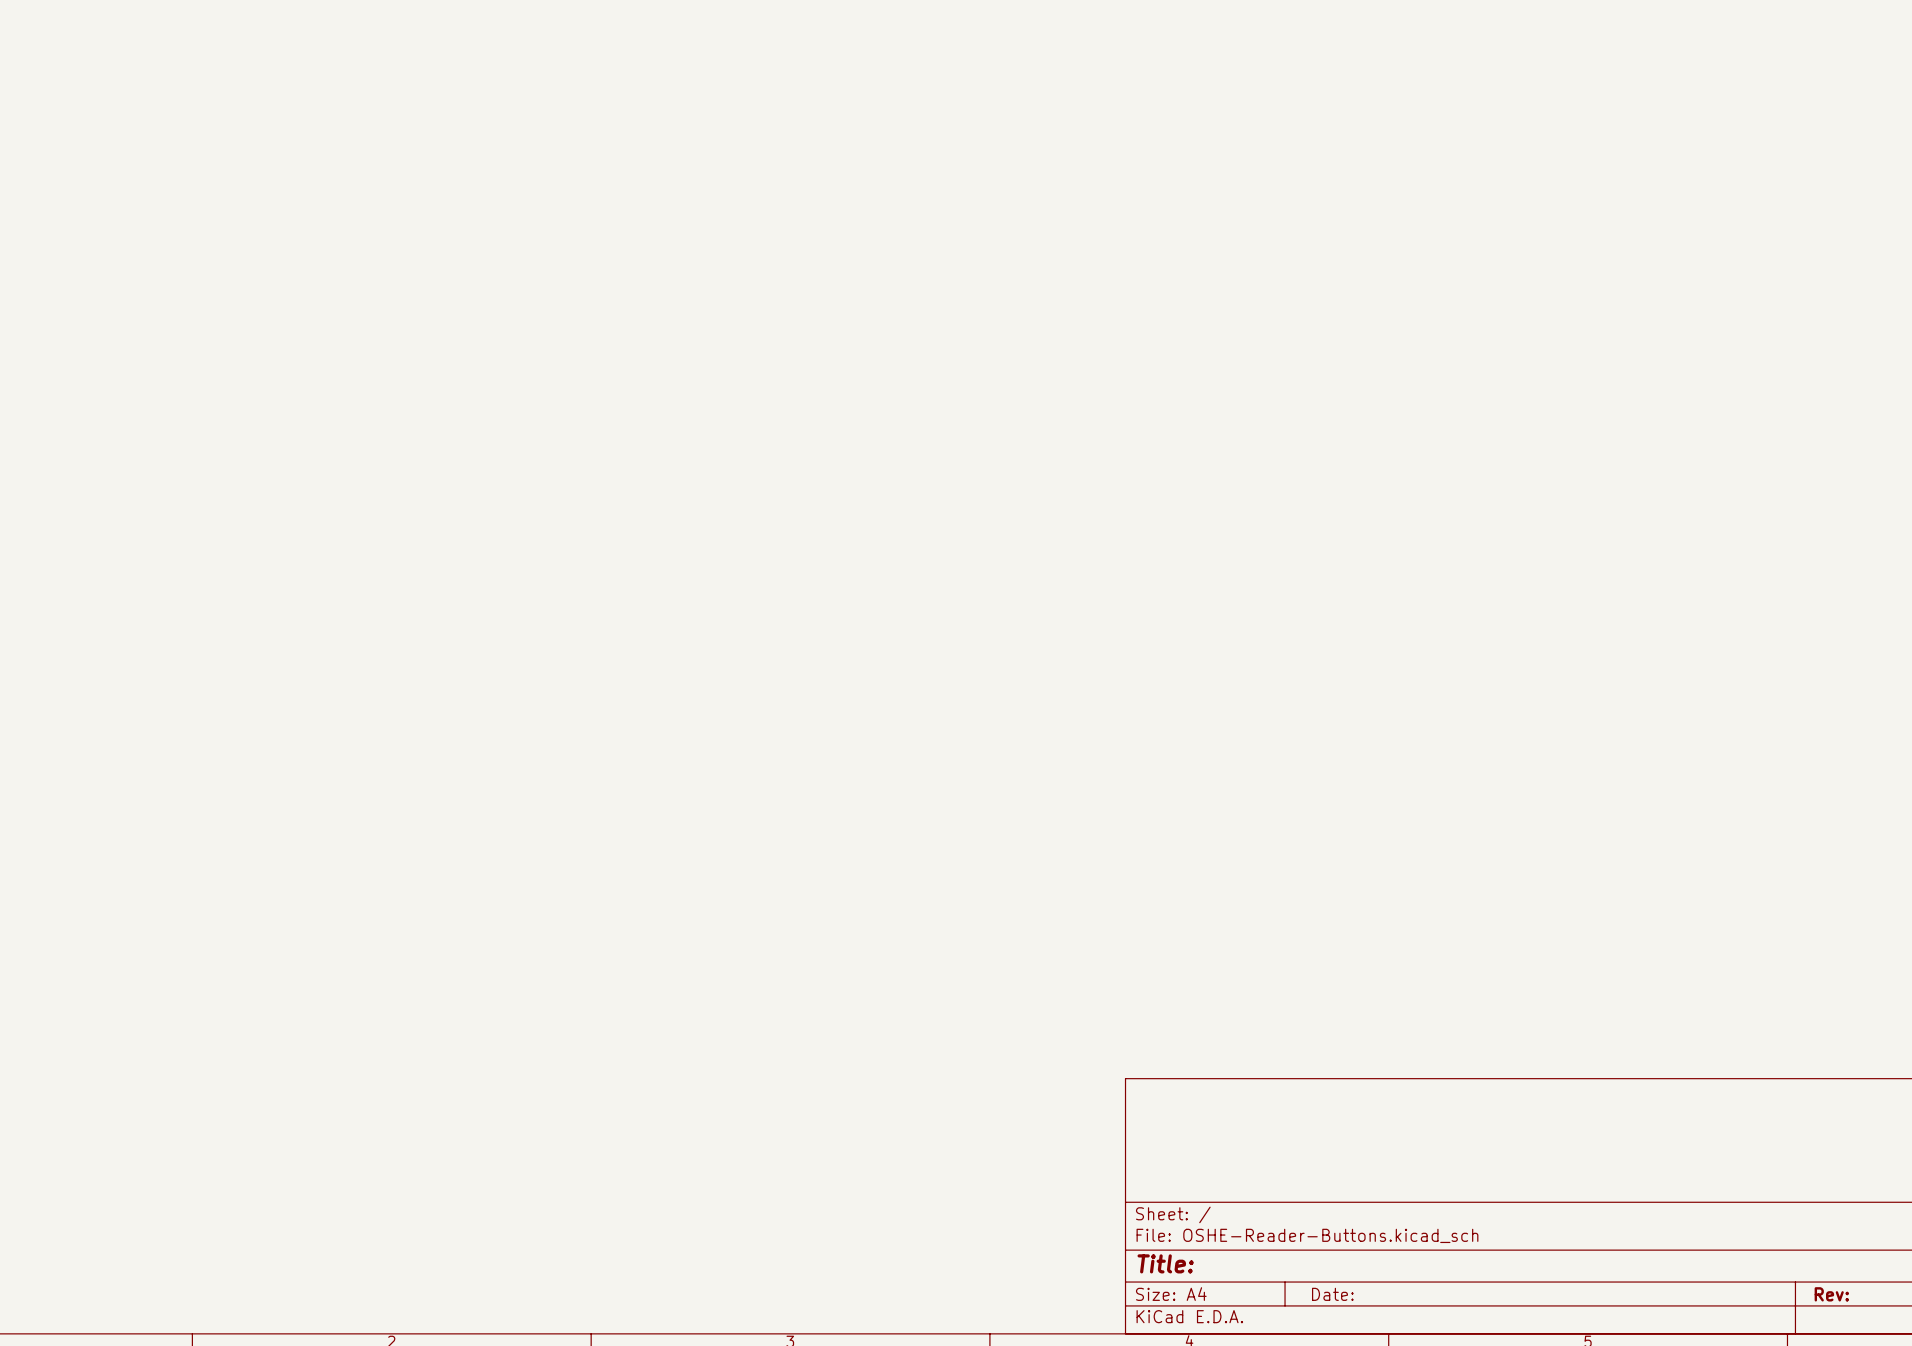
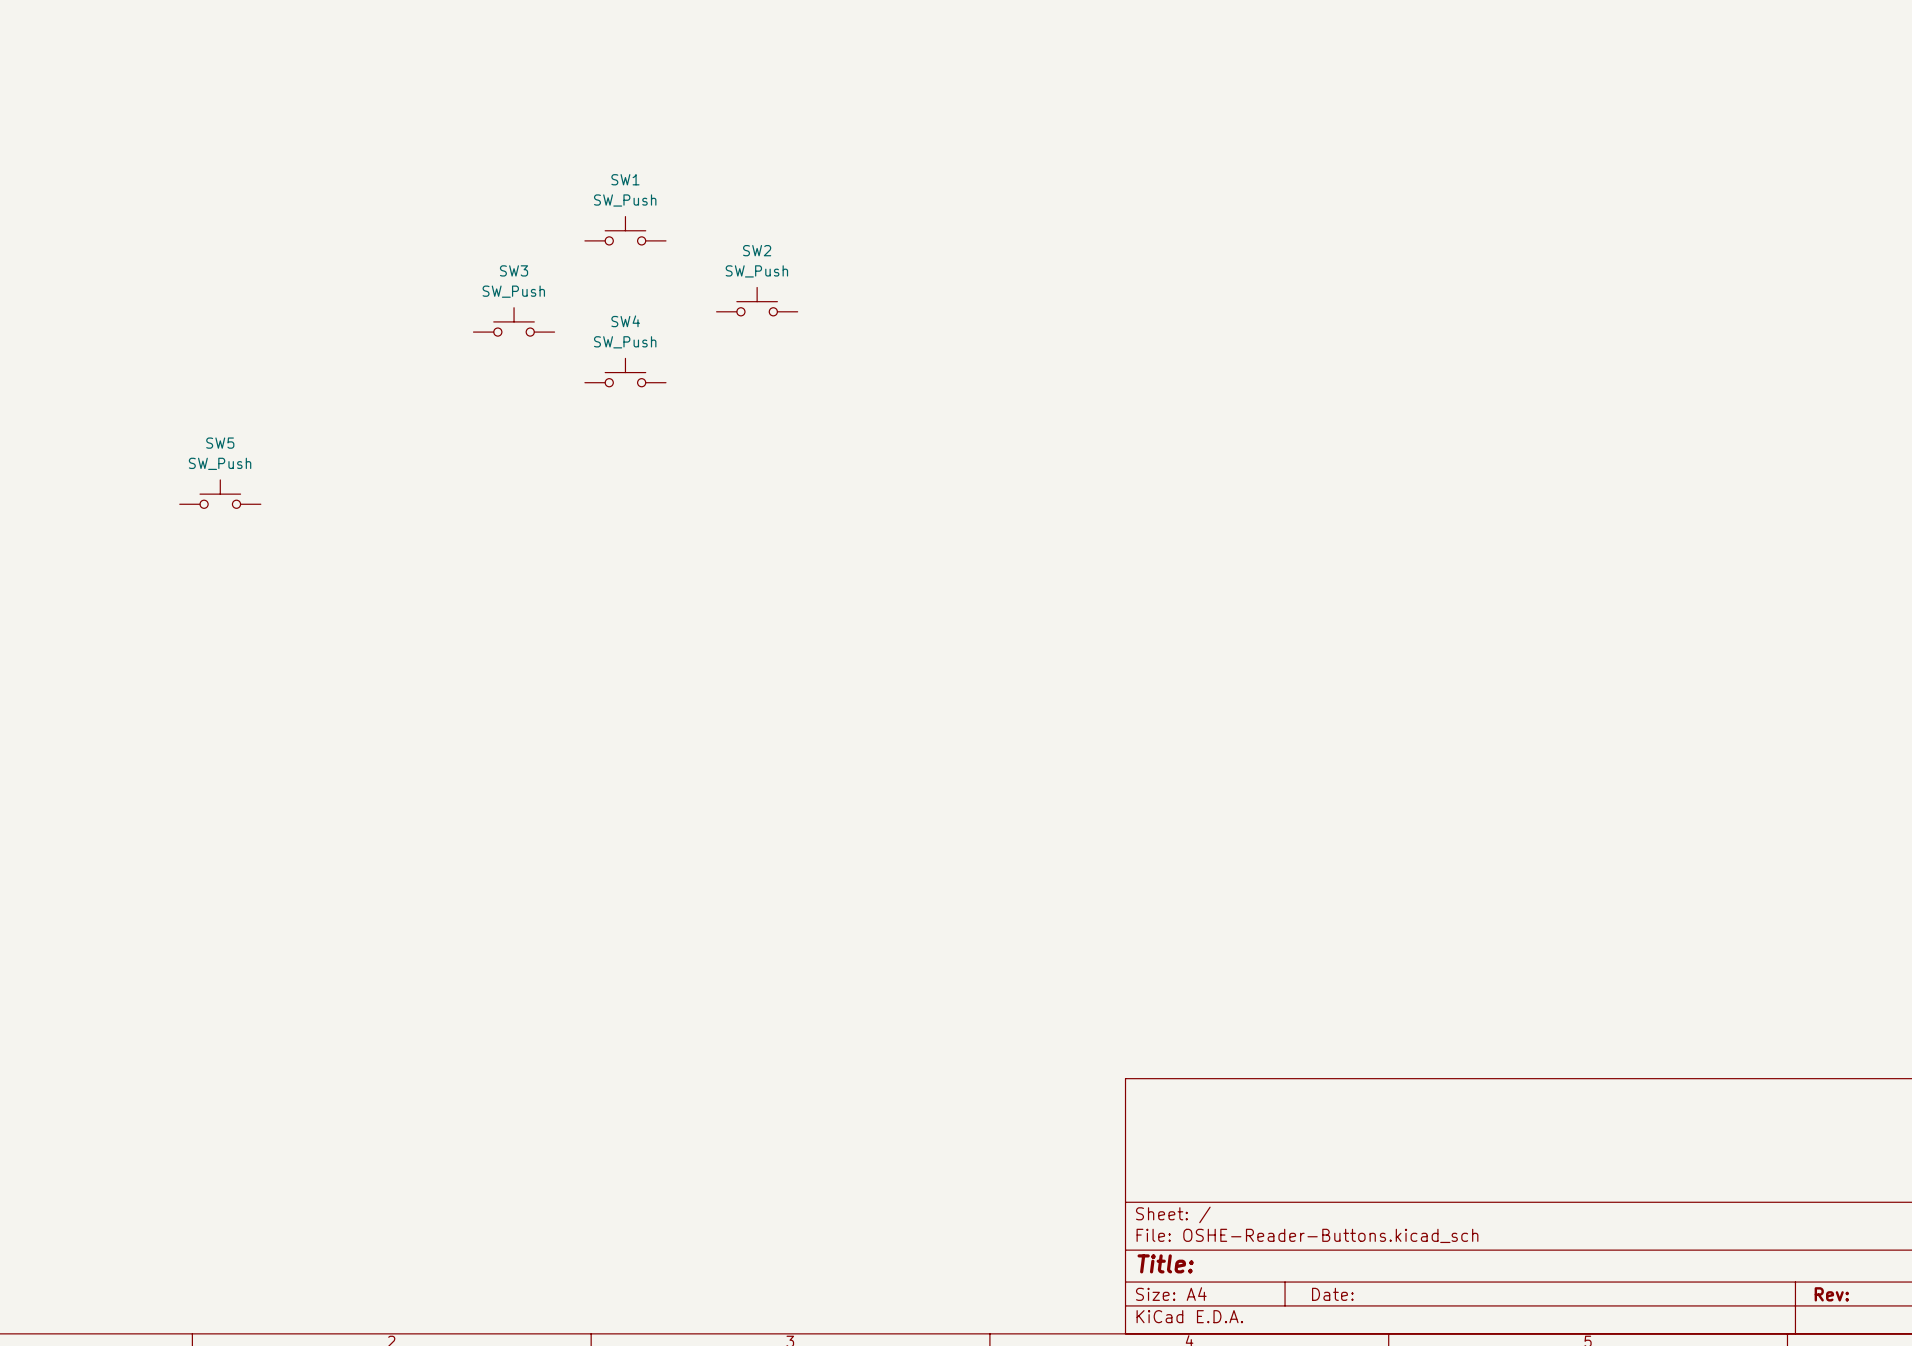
SW1: none -> SW_Push (625, 230)
SW2: none -> SW_Push (757, 301)
SW3: none -> SW_Push (514, 321)
SW4: none -> SW_Push (625, 372)
SW5: none -> SW_Push (220, 494)

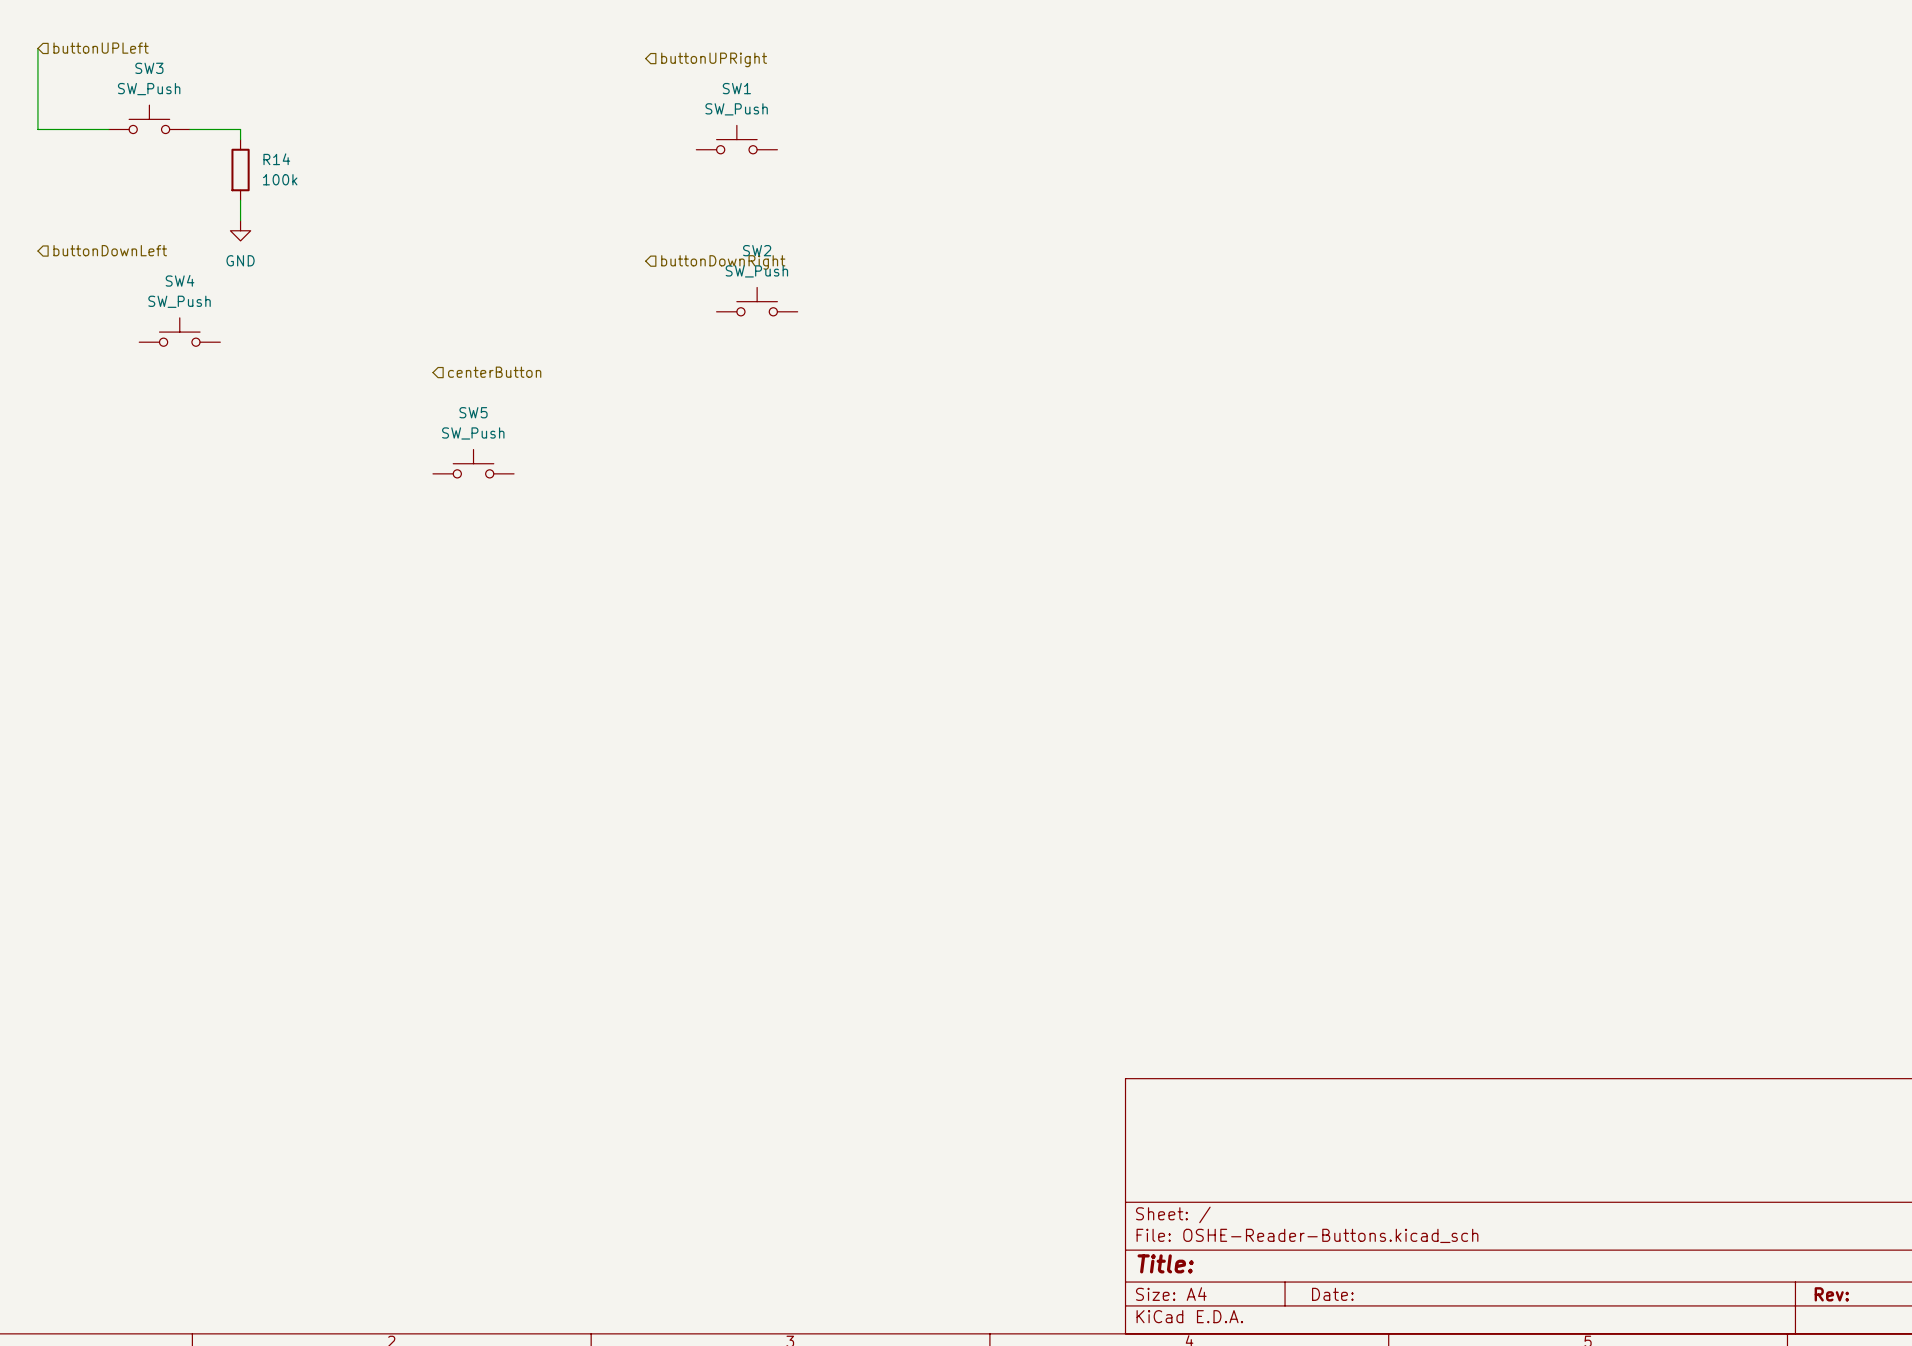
wire: none -> (37, 48) (37, 129) (108, 129)
hierarchical label: none -> buttonUPLeft (101, 48)
hierarchical label: none -> buttonUPRight (714, 59)
wire: none -> (189, 129) (240, 129) (240, 139)
R14: none -> 100k (240, 170)
wire: none -> (240, 200) (240, 220)
power symbol: none -> GND (240, 230)
SW1 position: (625, 230) -> (736, 139)
hierarchical label: none -> buttonDownLeft (110, 250)
hierarchical label: none -> buttonDownRight (723, 262)
SW3 position: (514, 321) -> (149, 119)
hierarchical label: none -> centerButton (494, 372)
SW4 position: (625, 372) -> (179, 332)
SW5 position: (220, 494) -> (473, 463)

